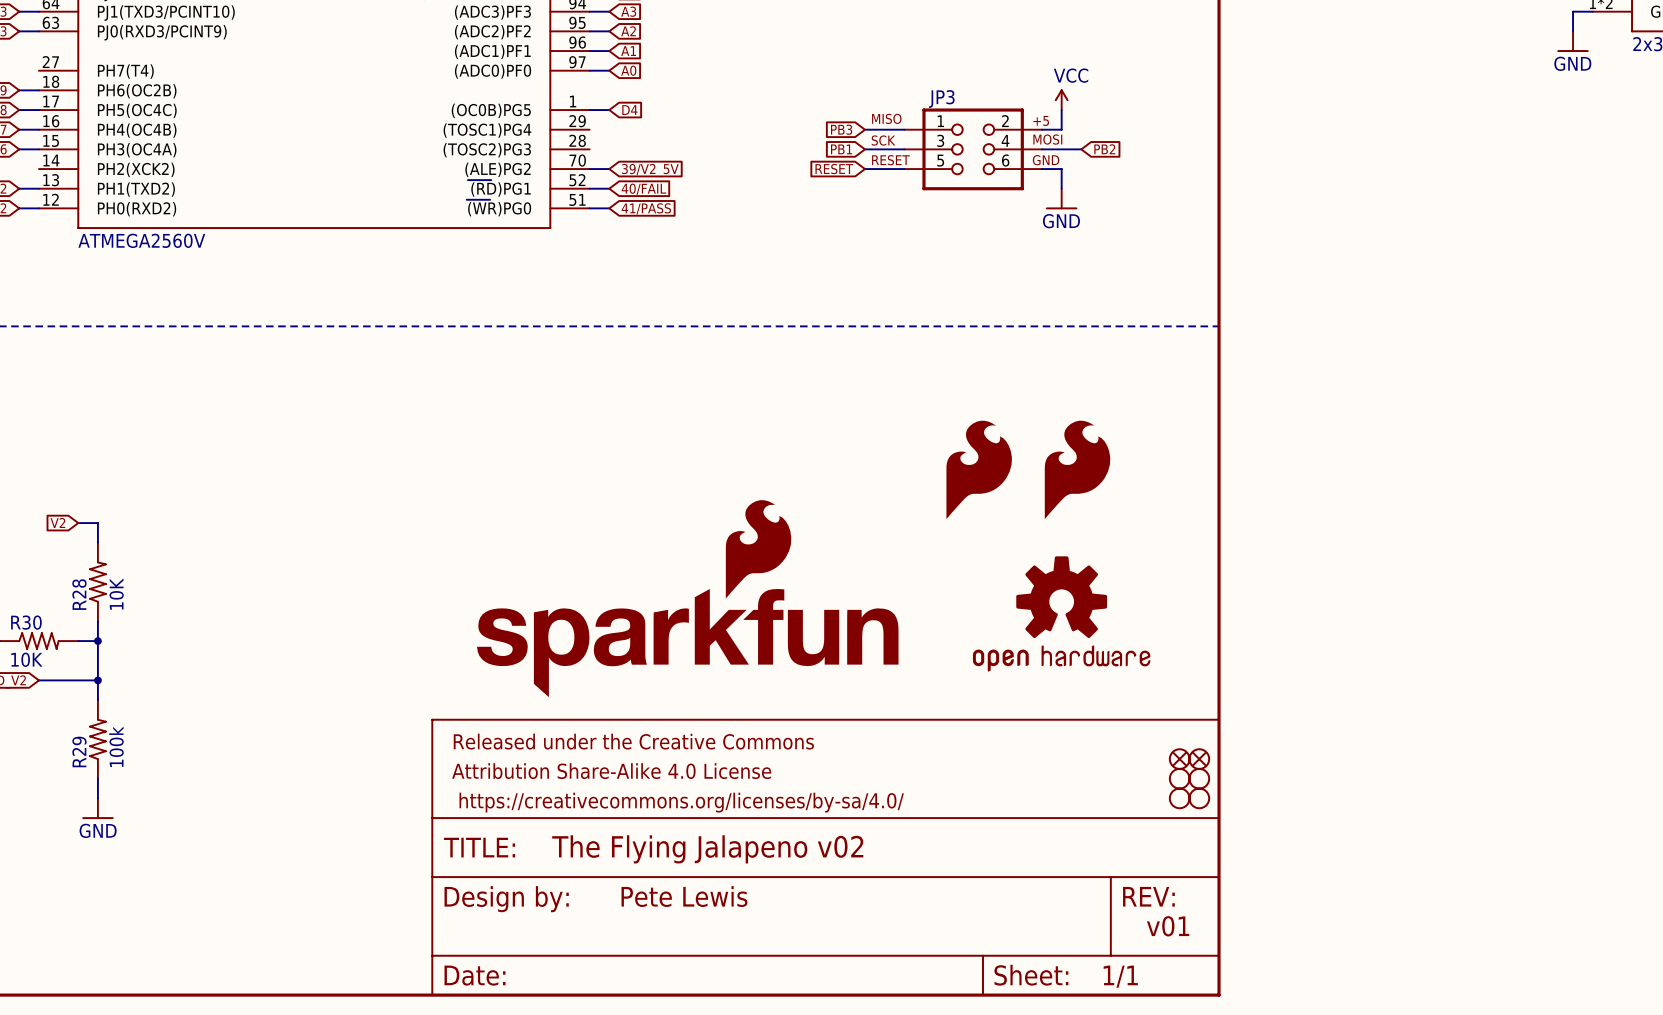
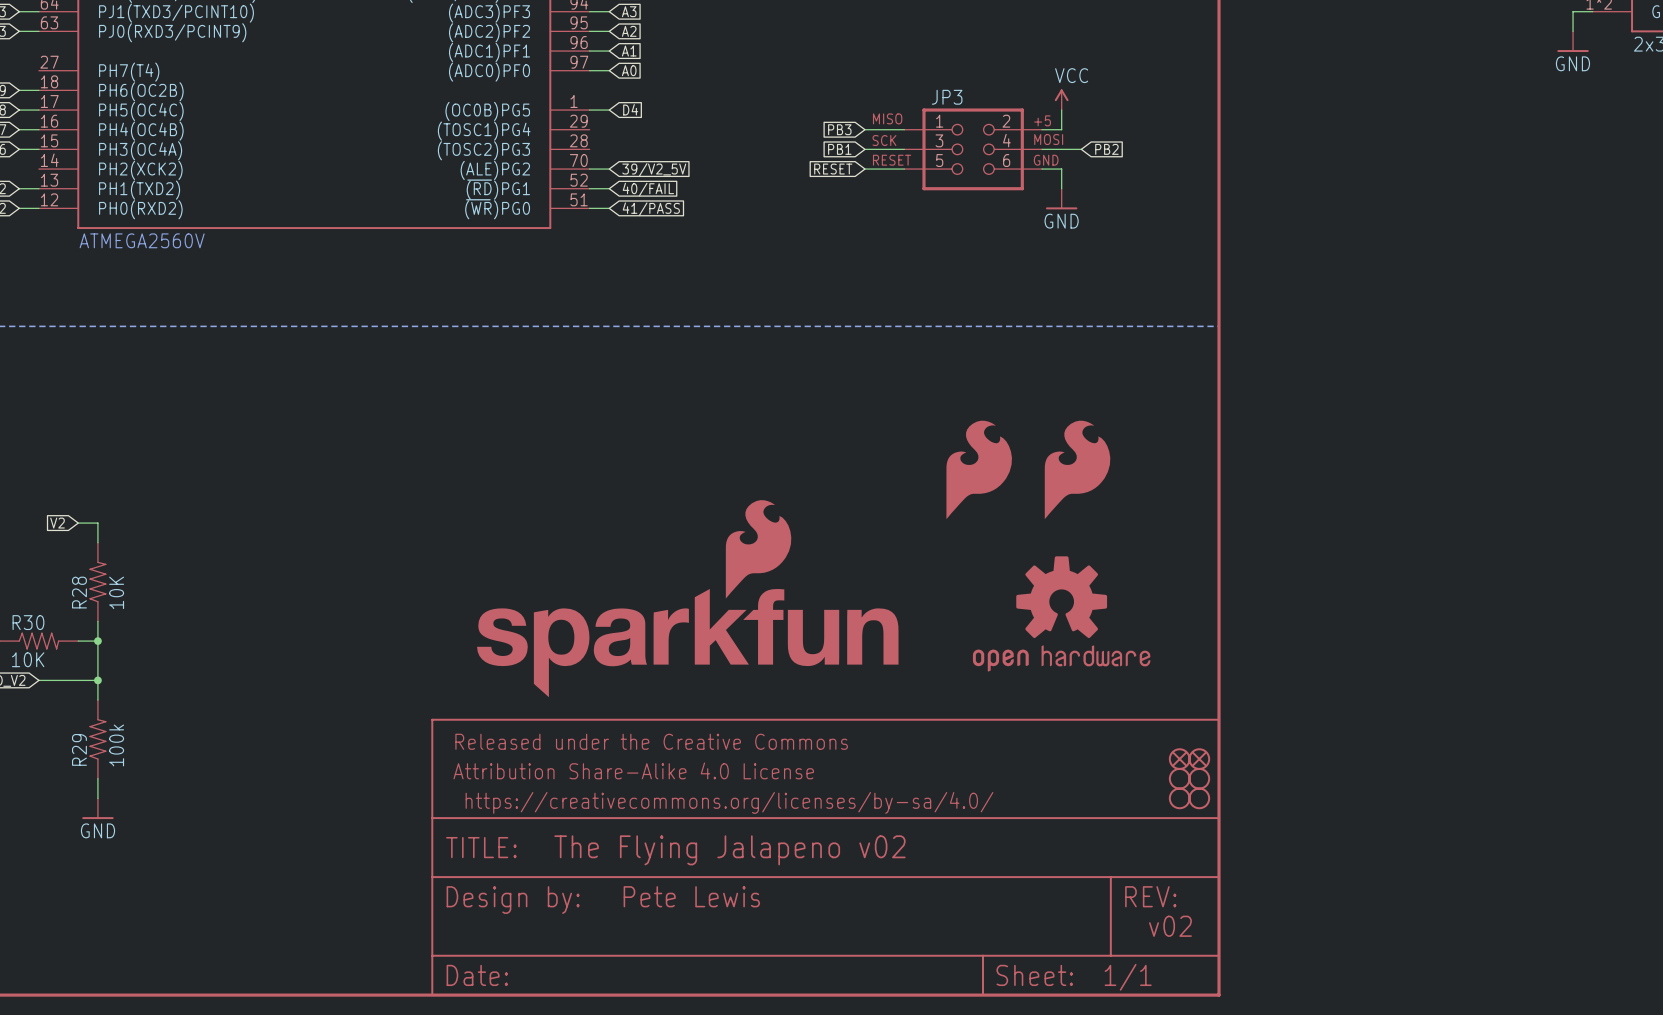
text: v01 (1168, 926) -> v02 (1170, 926)

